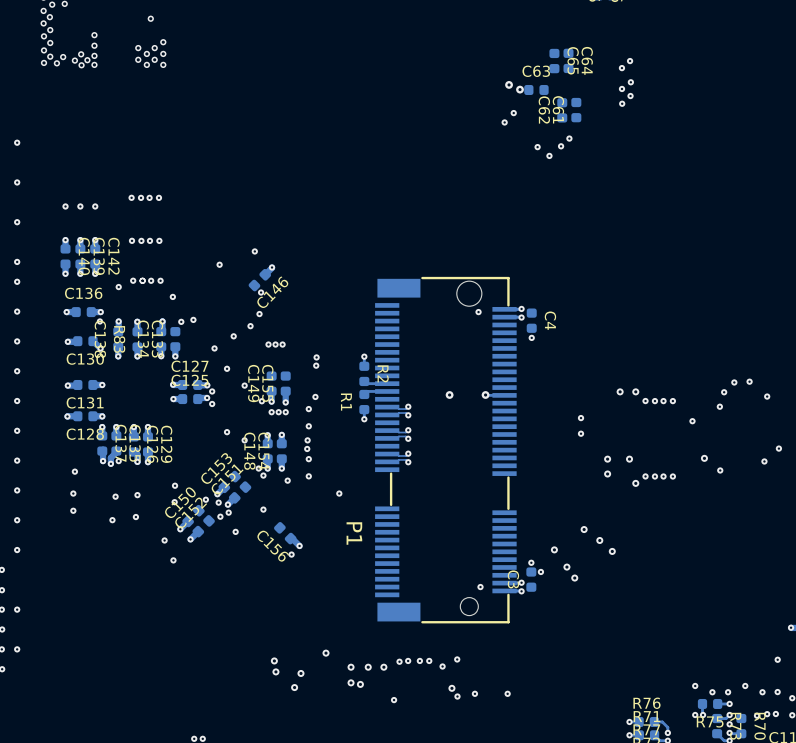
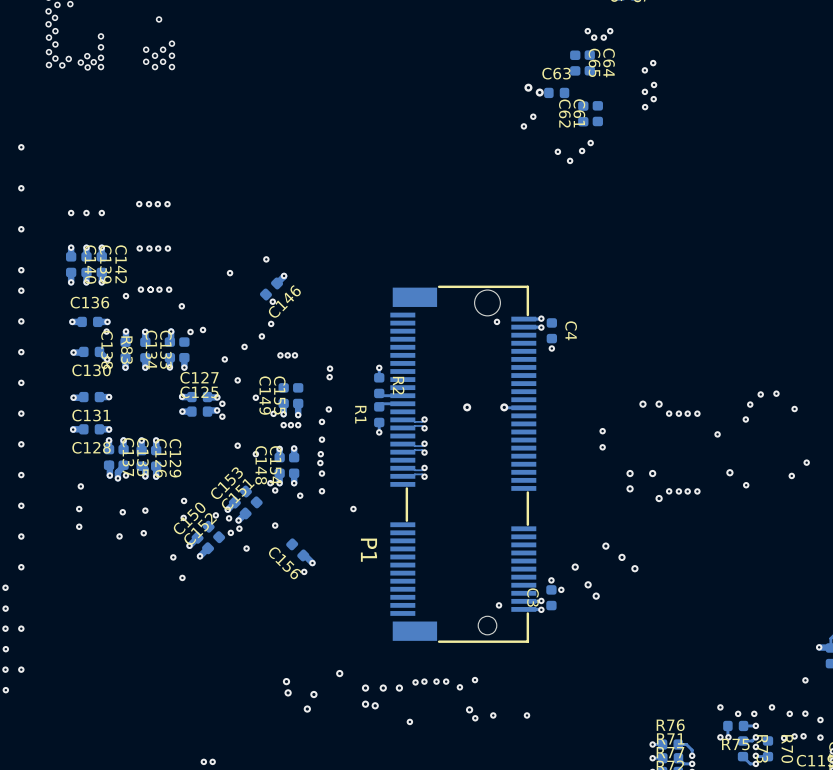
via: none -> (587, 31)
via: none -> (610, 31)
via: none -> (594, 37)
via: none -> (603, 37)

